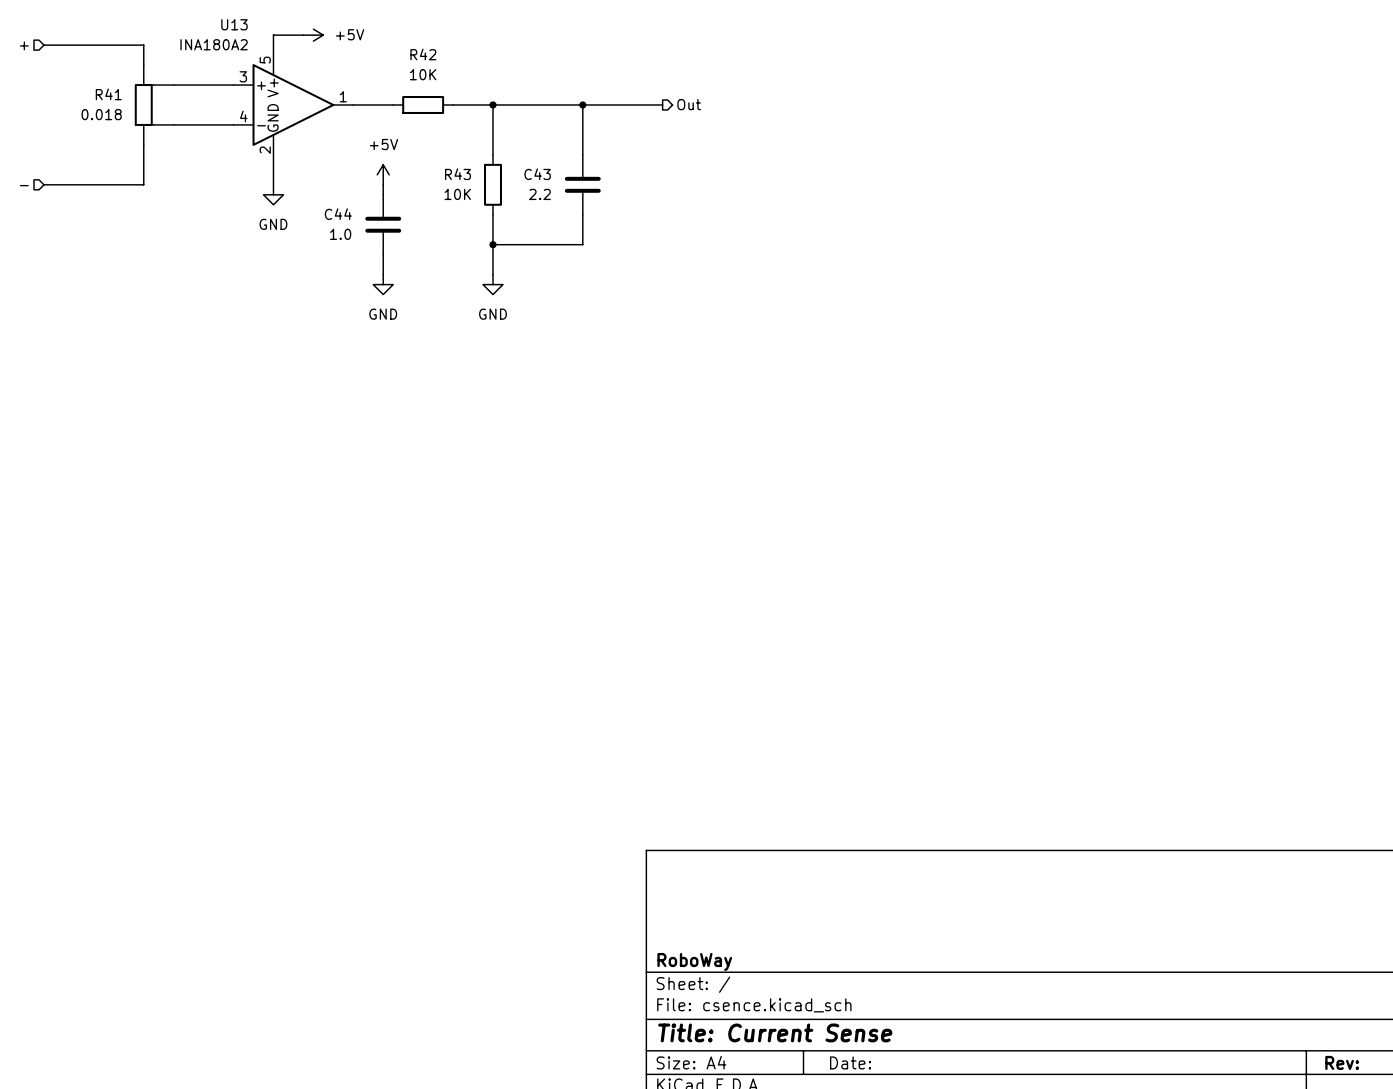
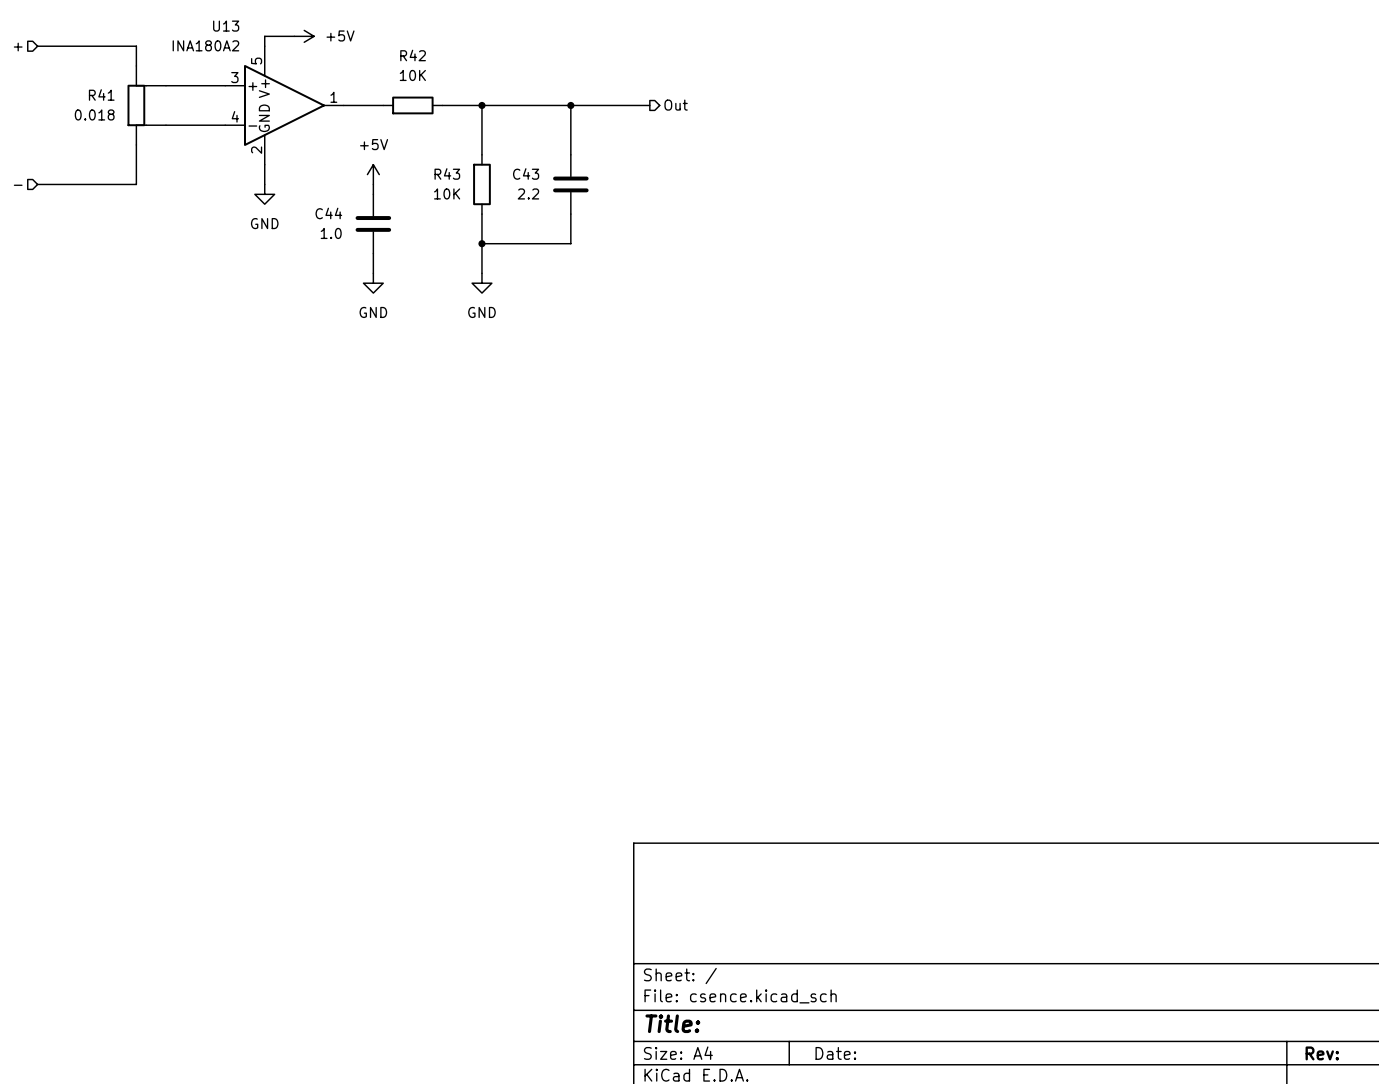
title block: RoboWay (694, 961) -> none
title block: Title: Current Sense (775, 1032) -> Title: (672, 1023)

